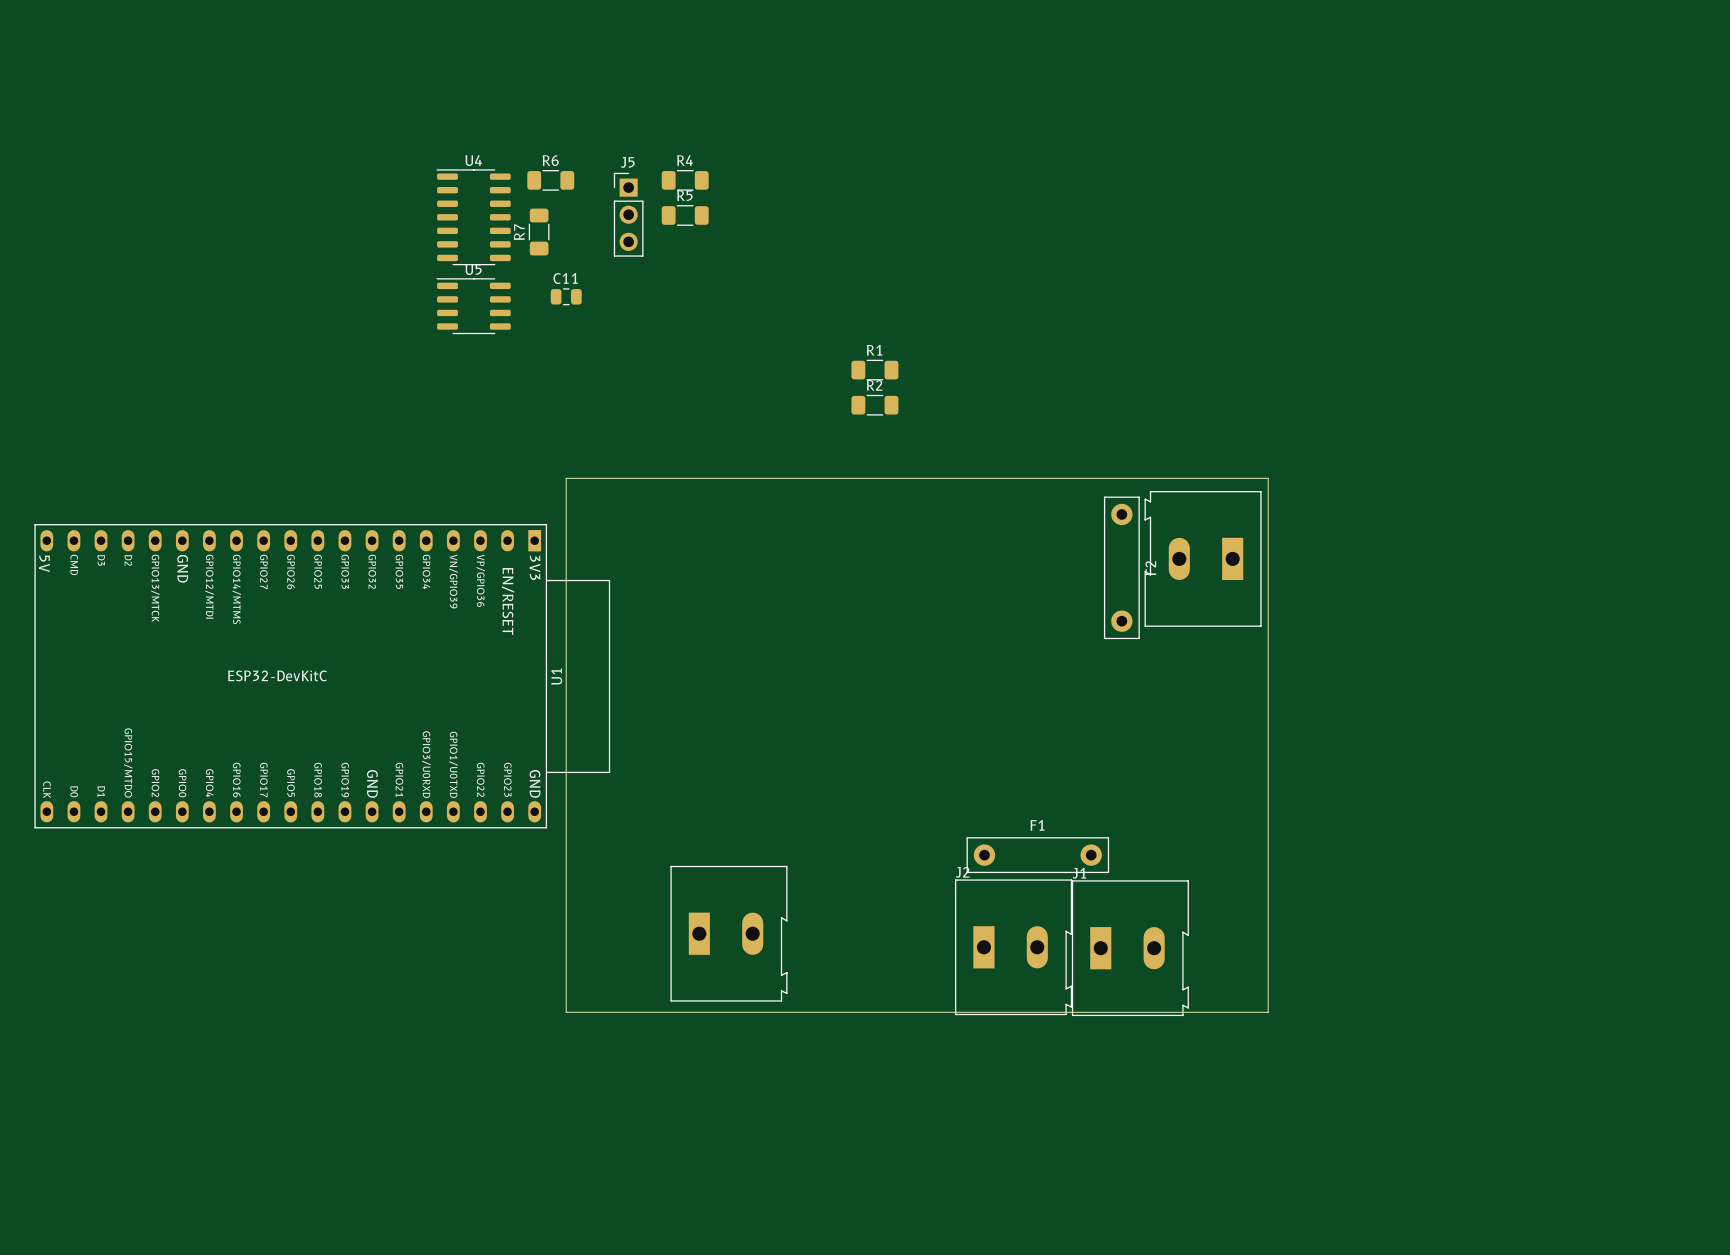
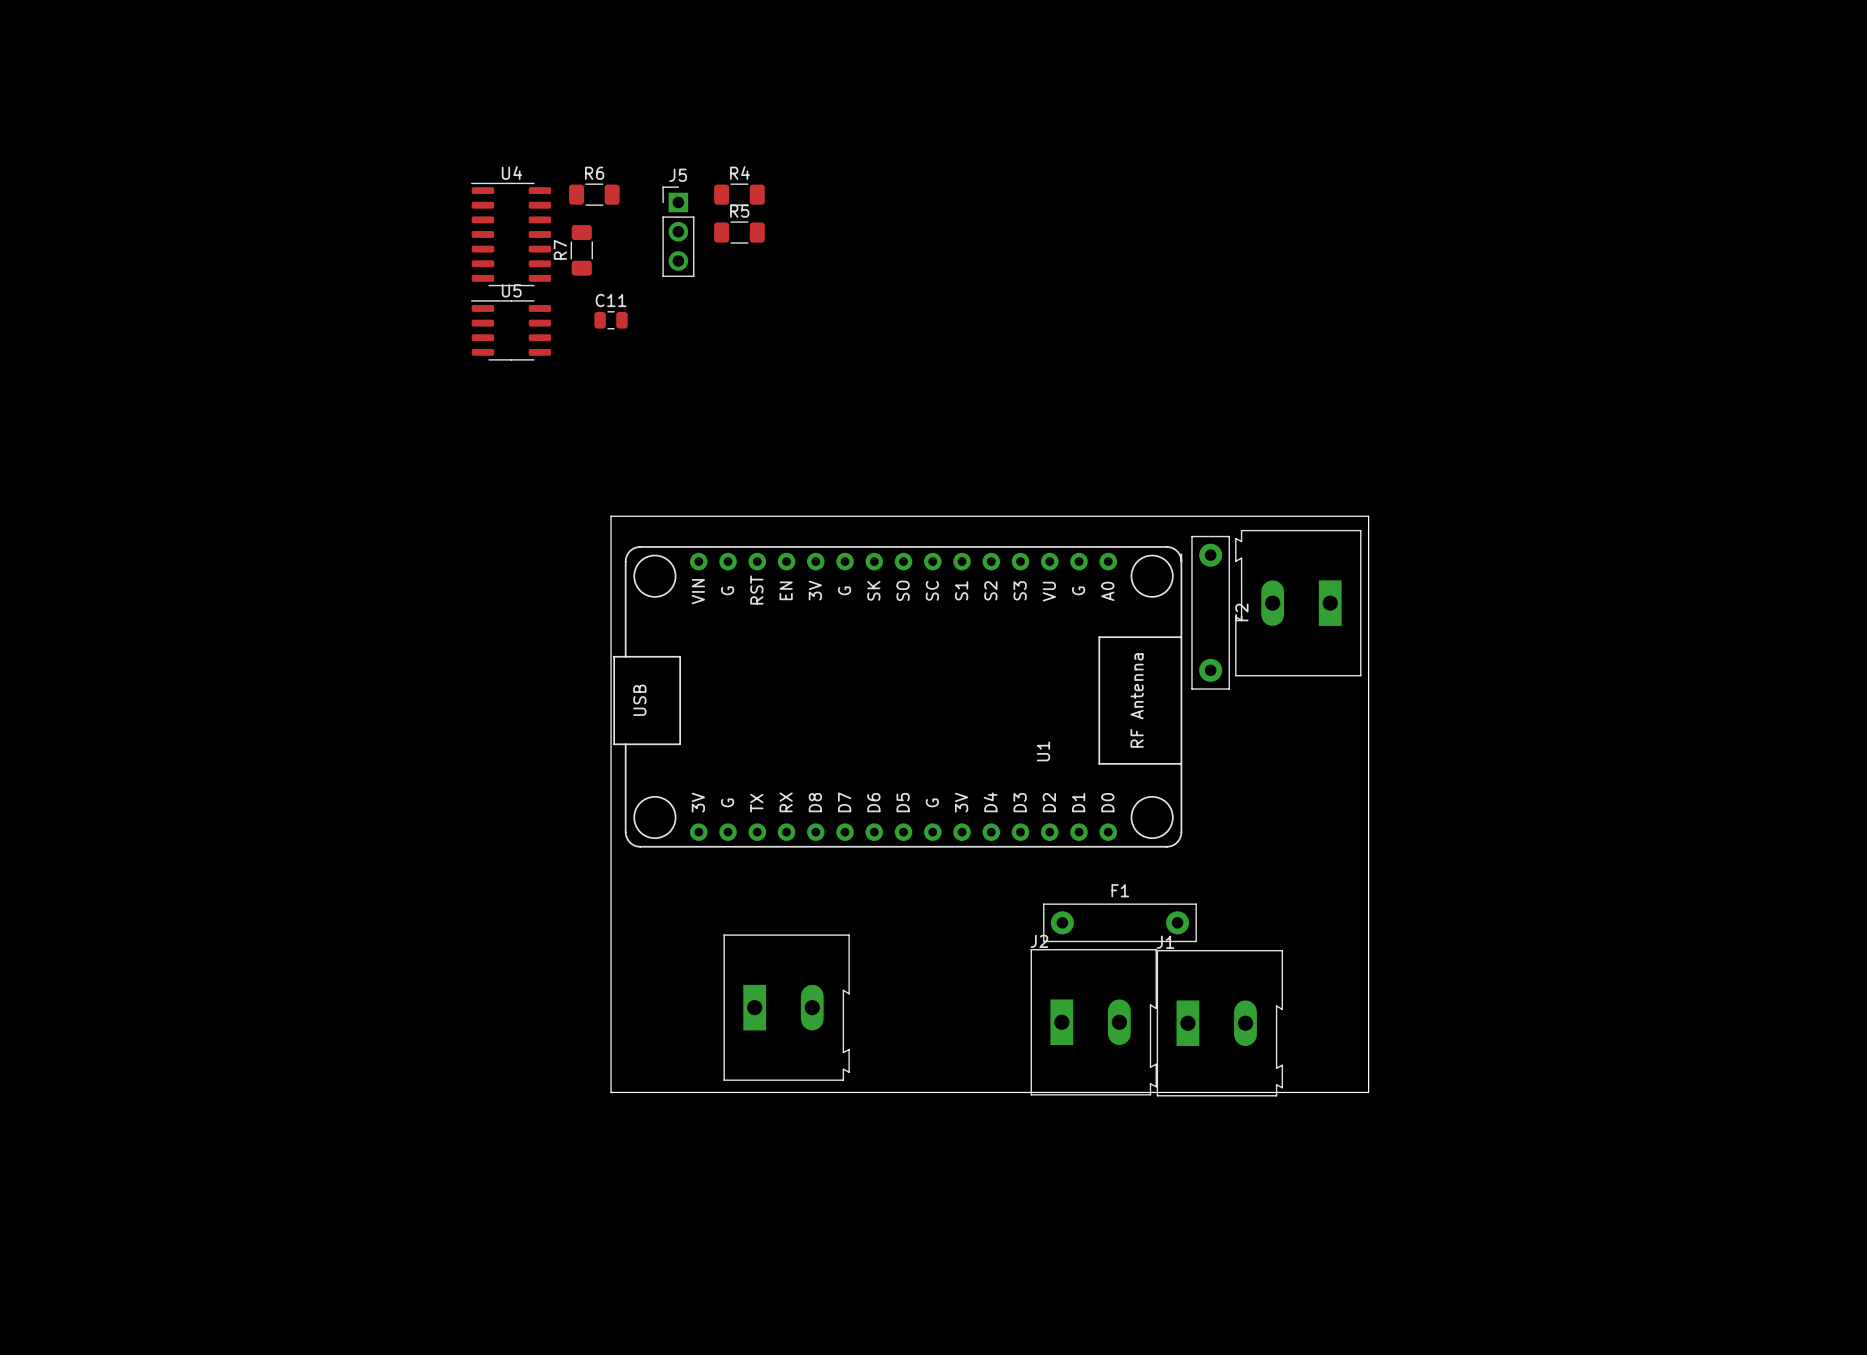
R1: (874, 370) -> none
R2: (874, 405) -> none
U1 footprint: [34, 524, 611, 829] -> [613, 546, 1183, 848]
U1 value: ESP32-DevKitC (277, 675) -> none
U1 name position: U1 (556, 676) -> U1 (1043, 751)

